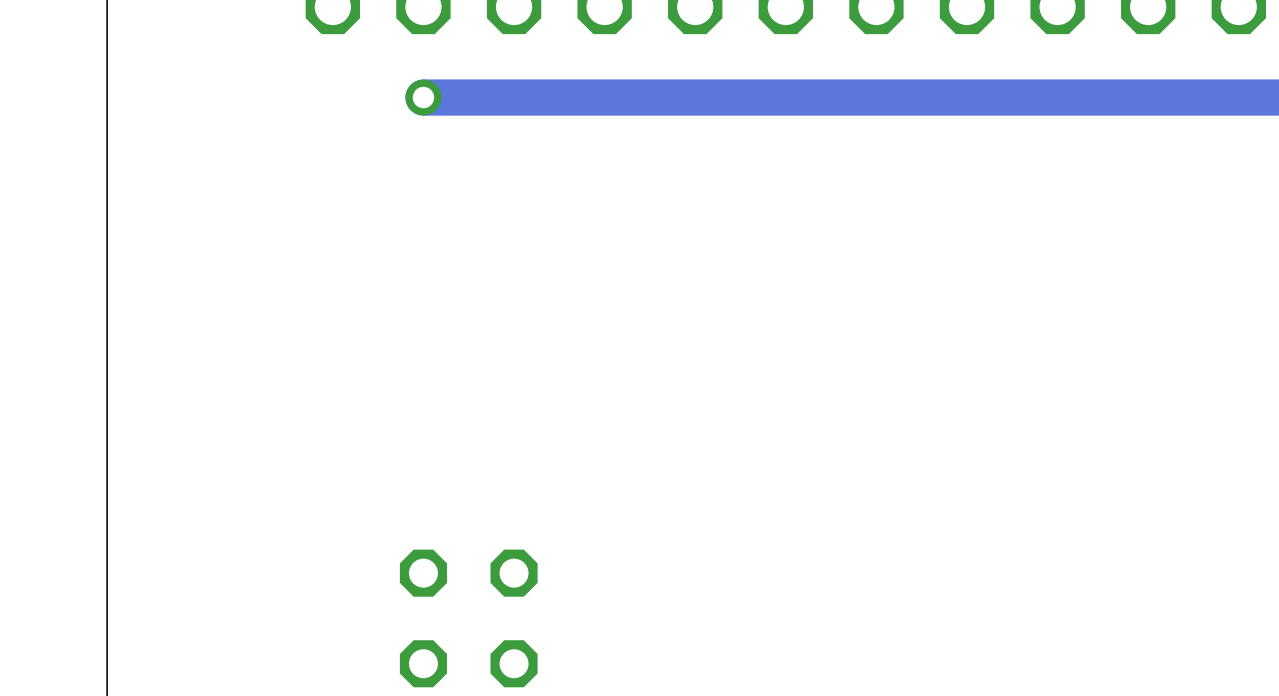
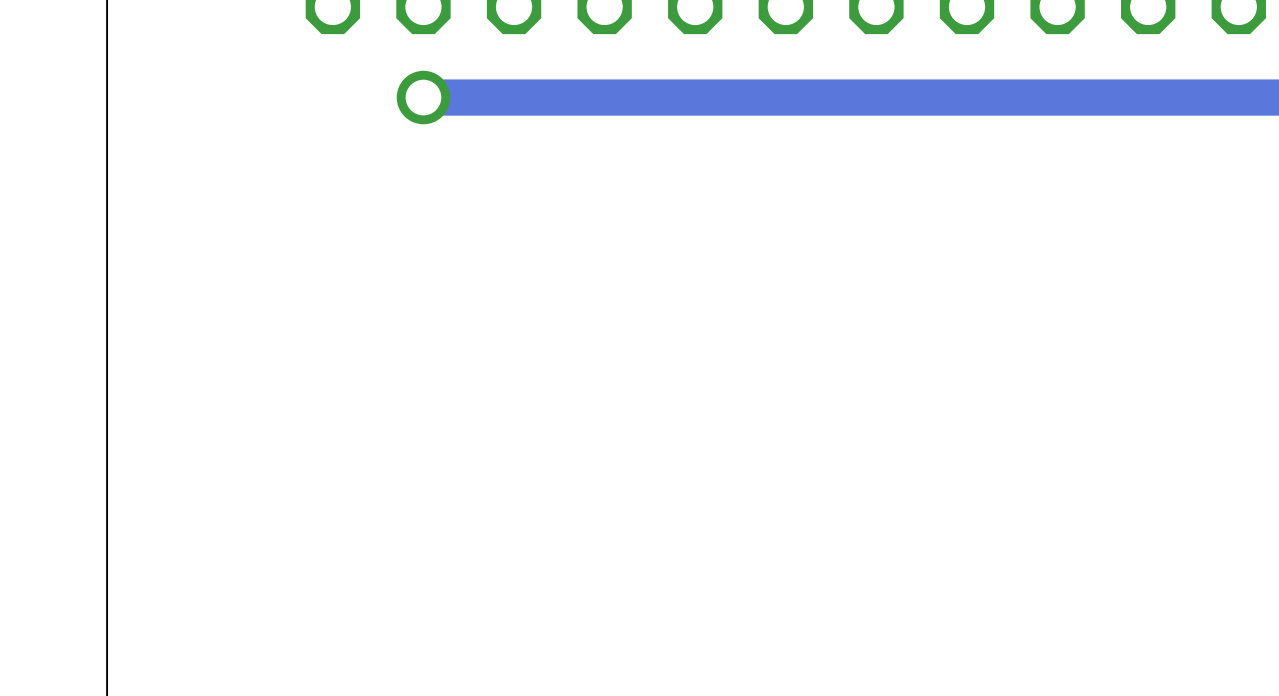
via size: [405, 79, 442, 116] -> [396, 70, 451, 125]
part: (468, 573) -> none
part: (468, 663) -> none

